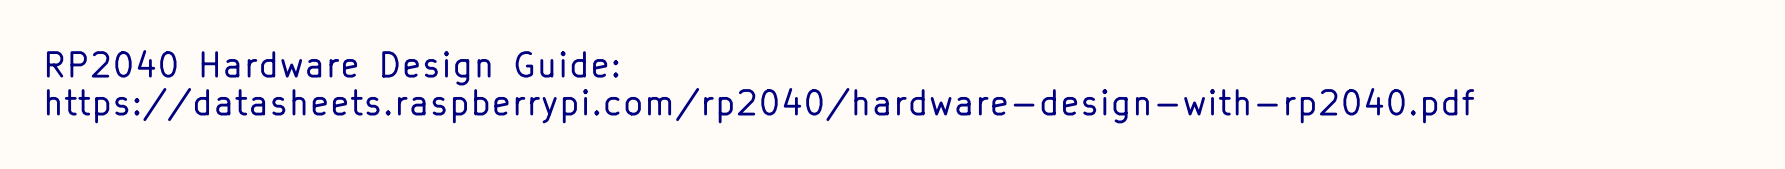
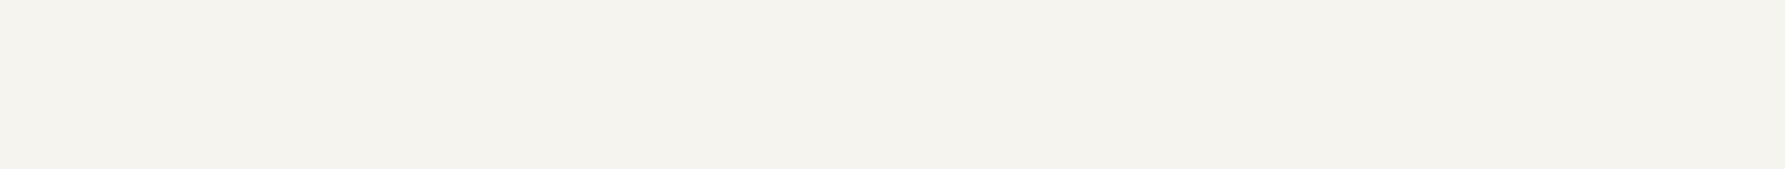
text: RP2040 Hardware Design Guide: (332, 67) -> none
text: https://datasheets.raspberrypi.com/rp2040/hardware-design-with-rp2040.pdf (760, 105) -> none

